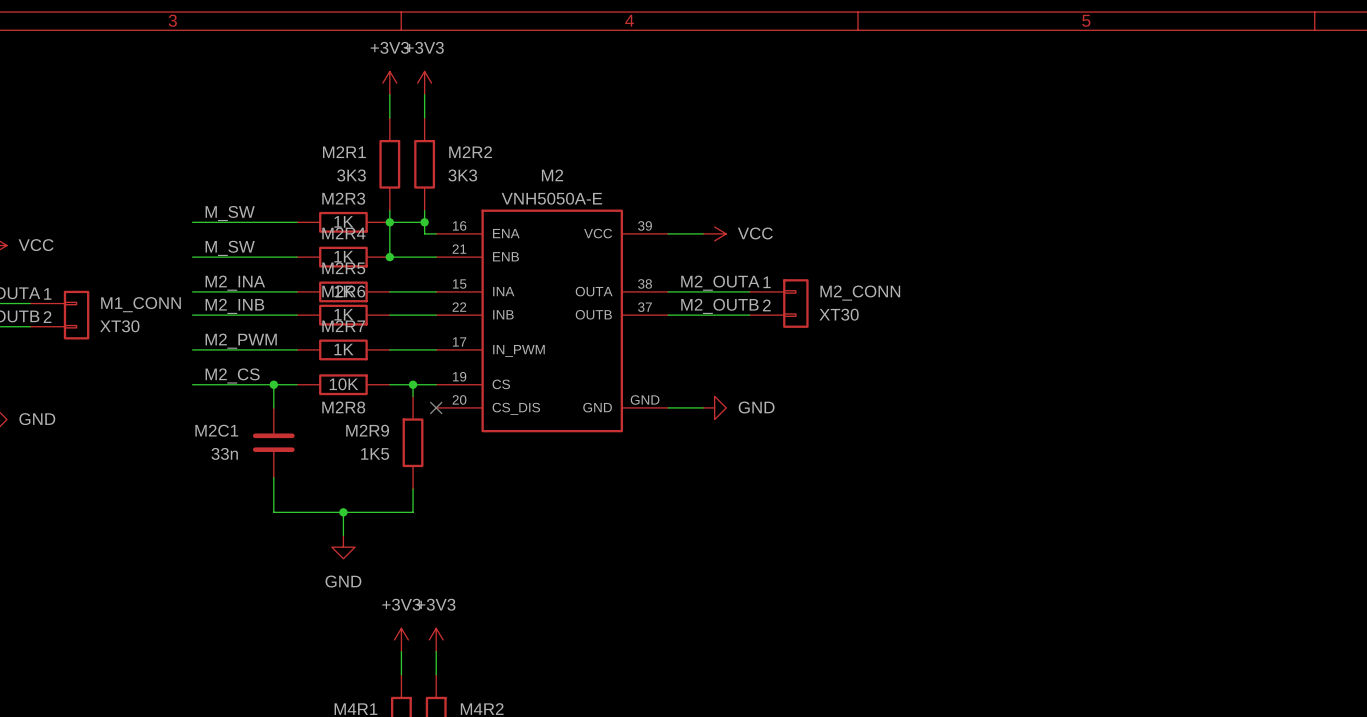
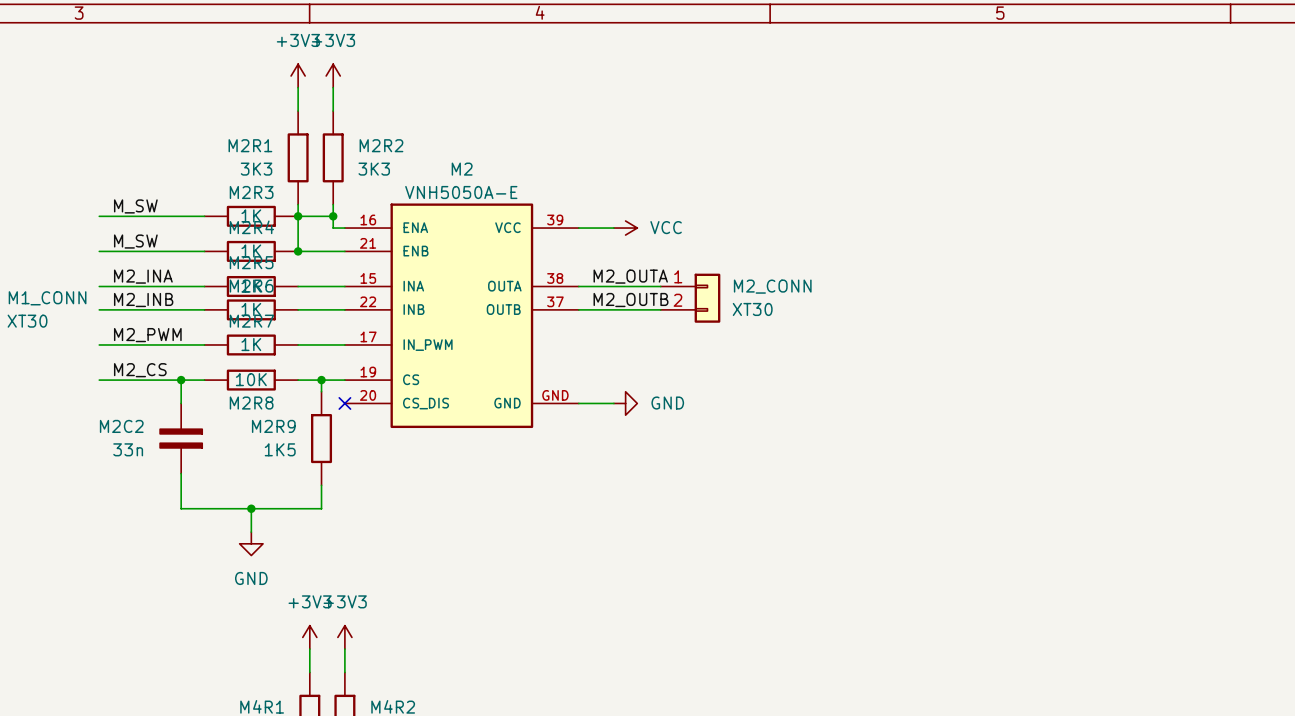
M2C1: 33n (273, 442) -> none
M2C2: none -> 33n (181, 438)

